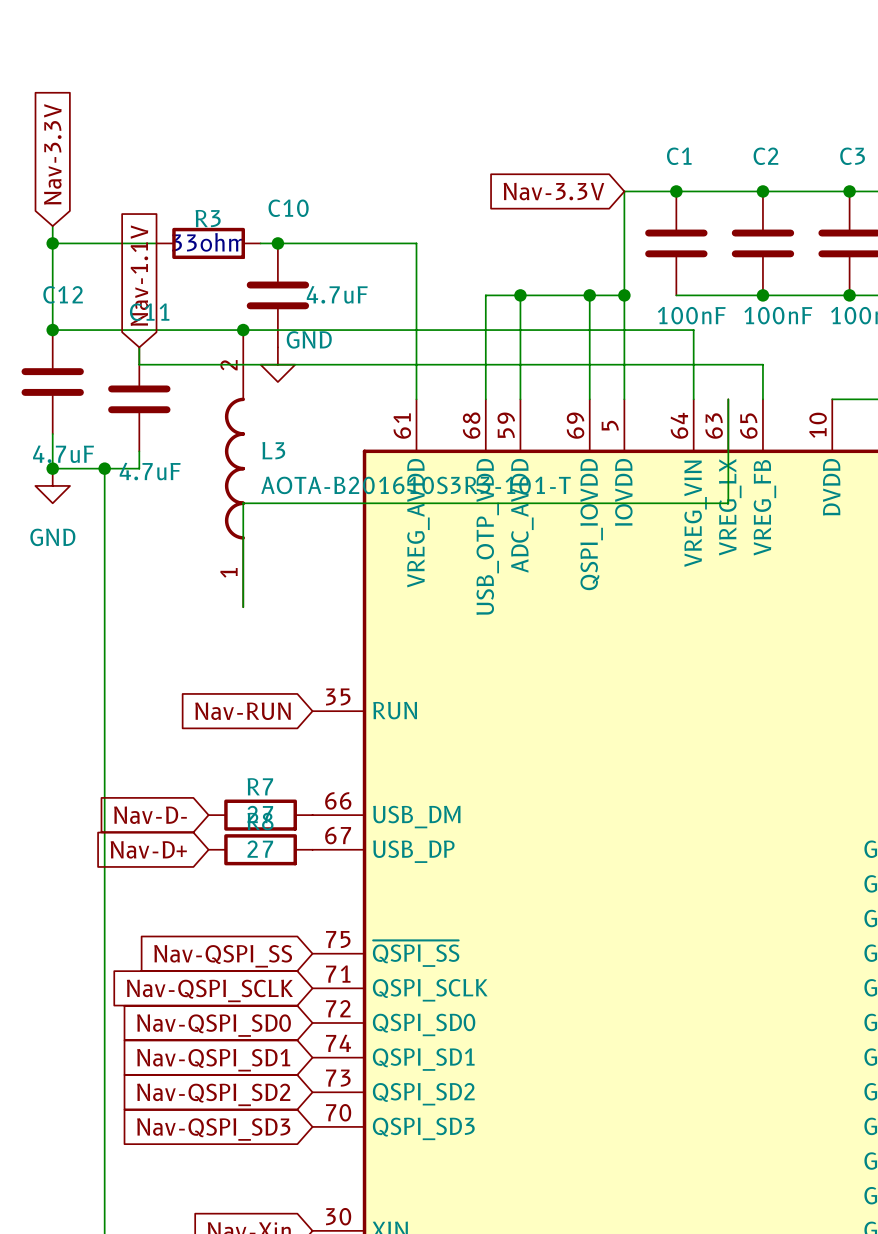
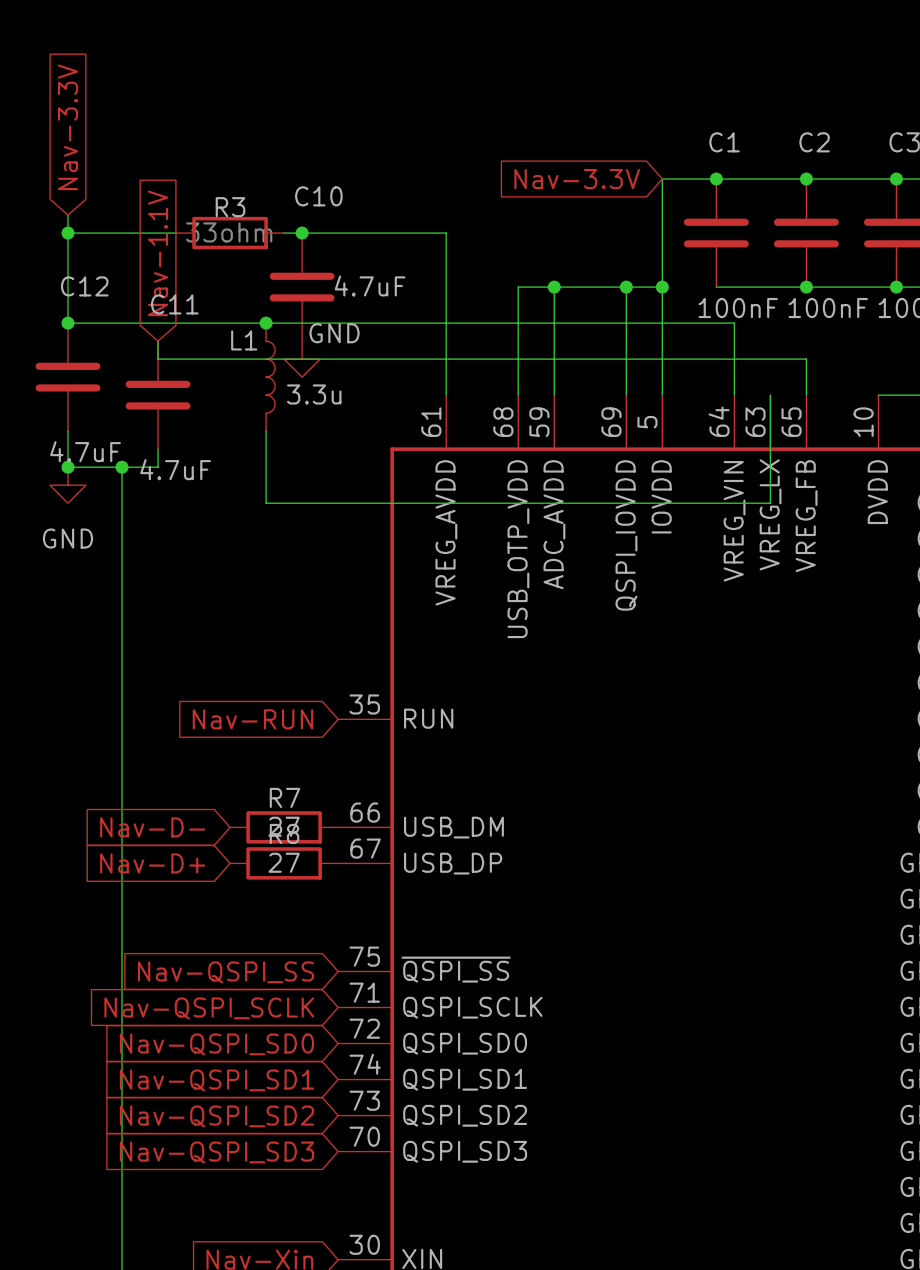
L1: none -> 3.3u (270, 377)
L3: AOTA-B201610S3R3-101-T (234, 468) -> none
wire: (243, 503) (243, 607) -> (266, 503) (266, 431)

